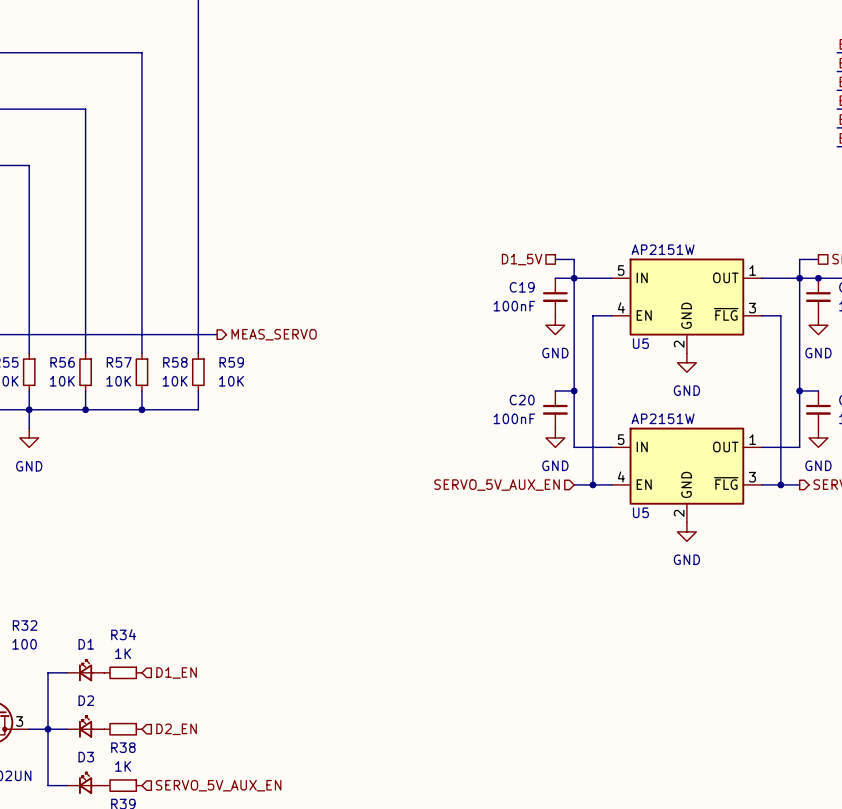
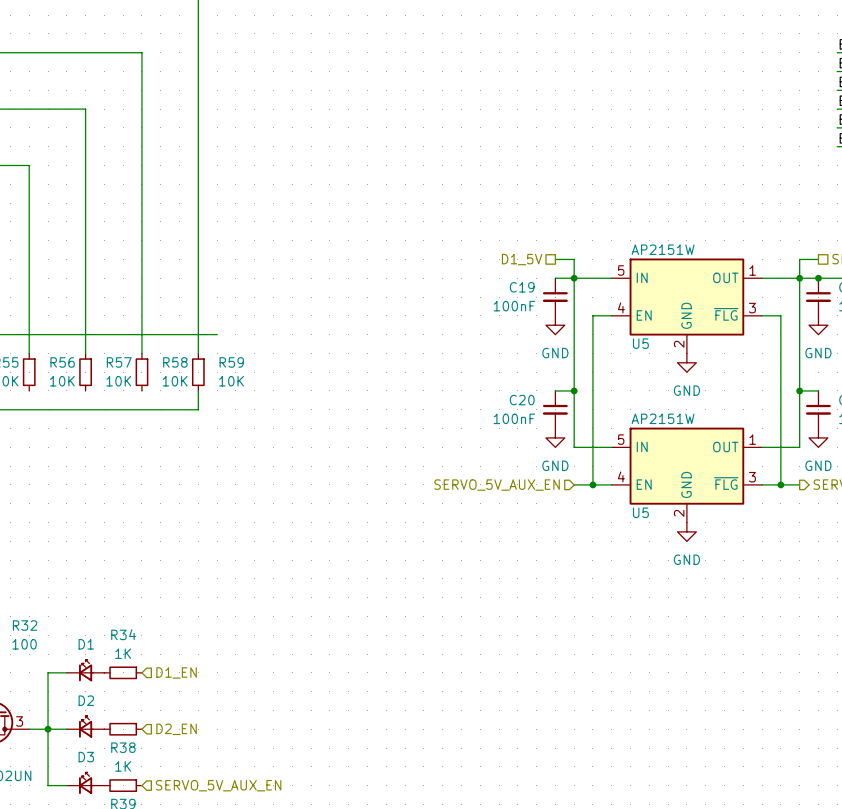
hierarchical label: MEAS_SERVO (274, 334) -> none
wire: (29, 390) (29, 428) -> none
wire: (85, 390) (85, 409) -> none
wire: (141, 390) (141, 409) -> none
junction: (29, 409) -> none
junction: (85, 409) -> none
junction: (141, 409) -> none
power symbol: GND (29, 437) -> none

